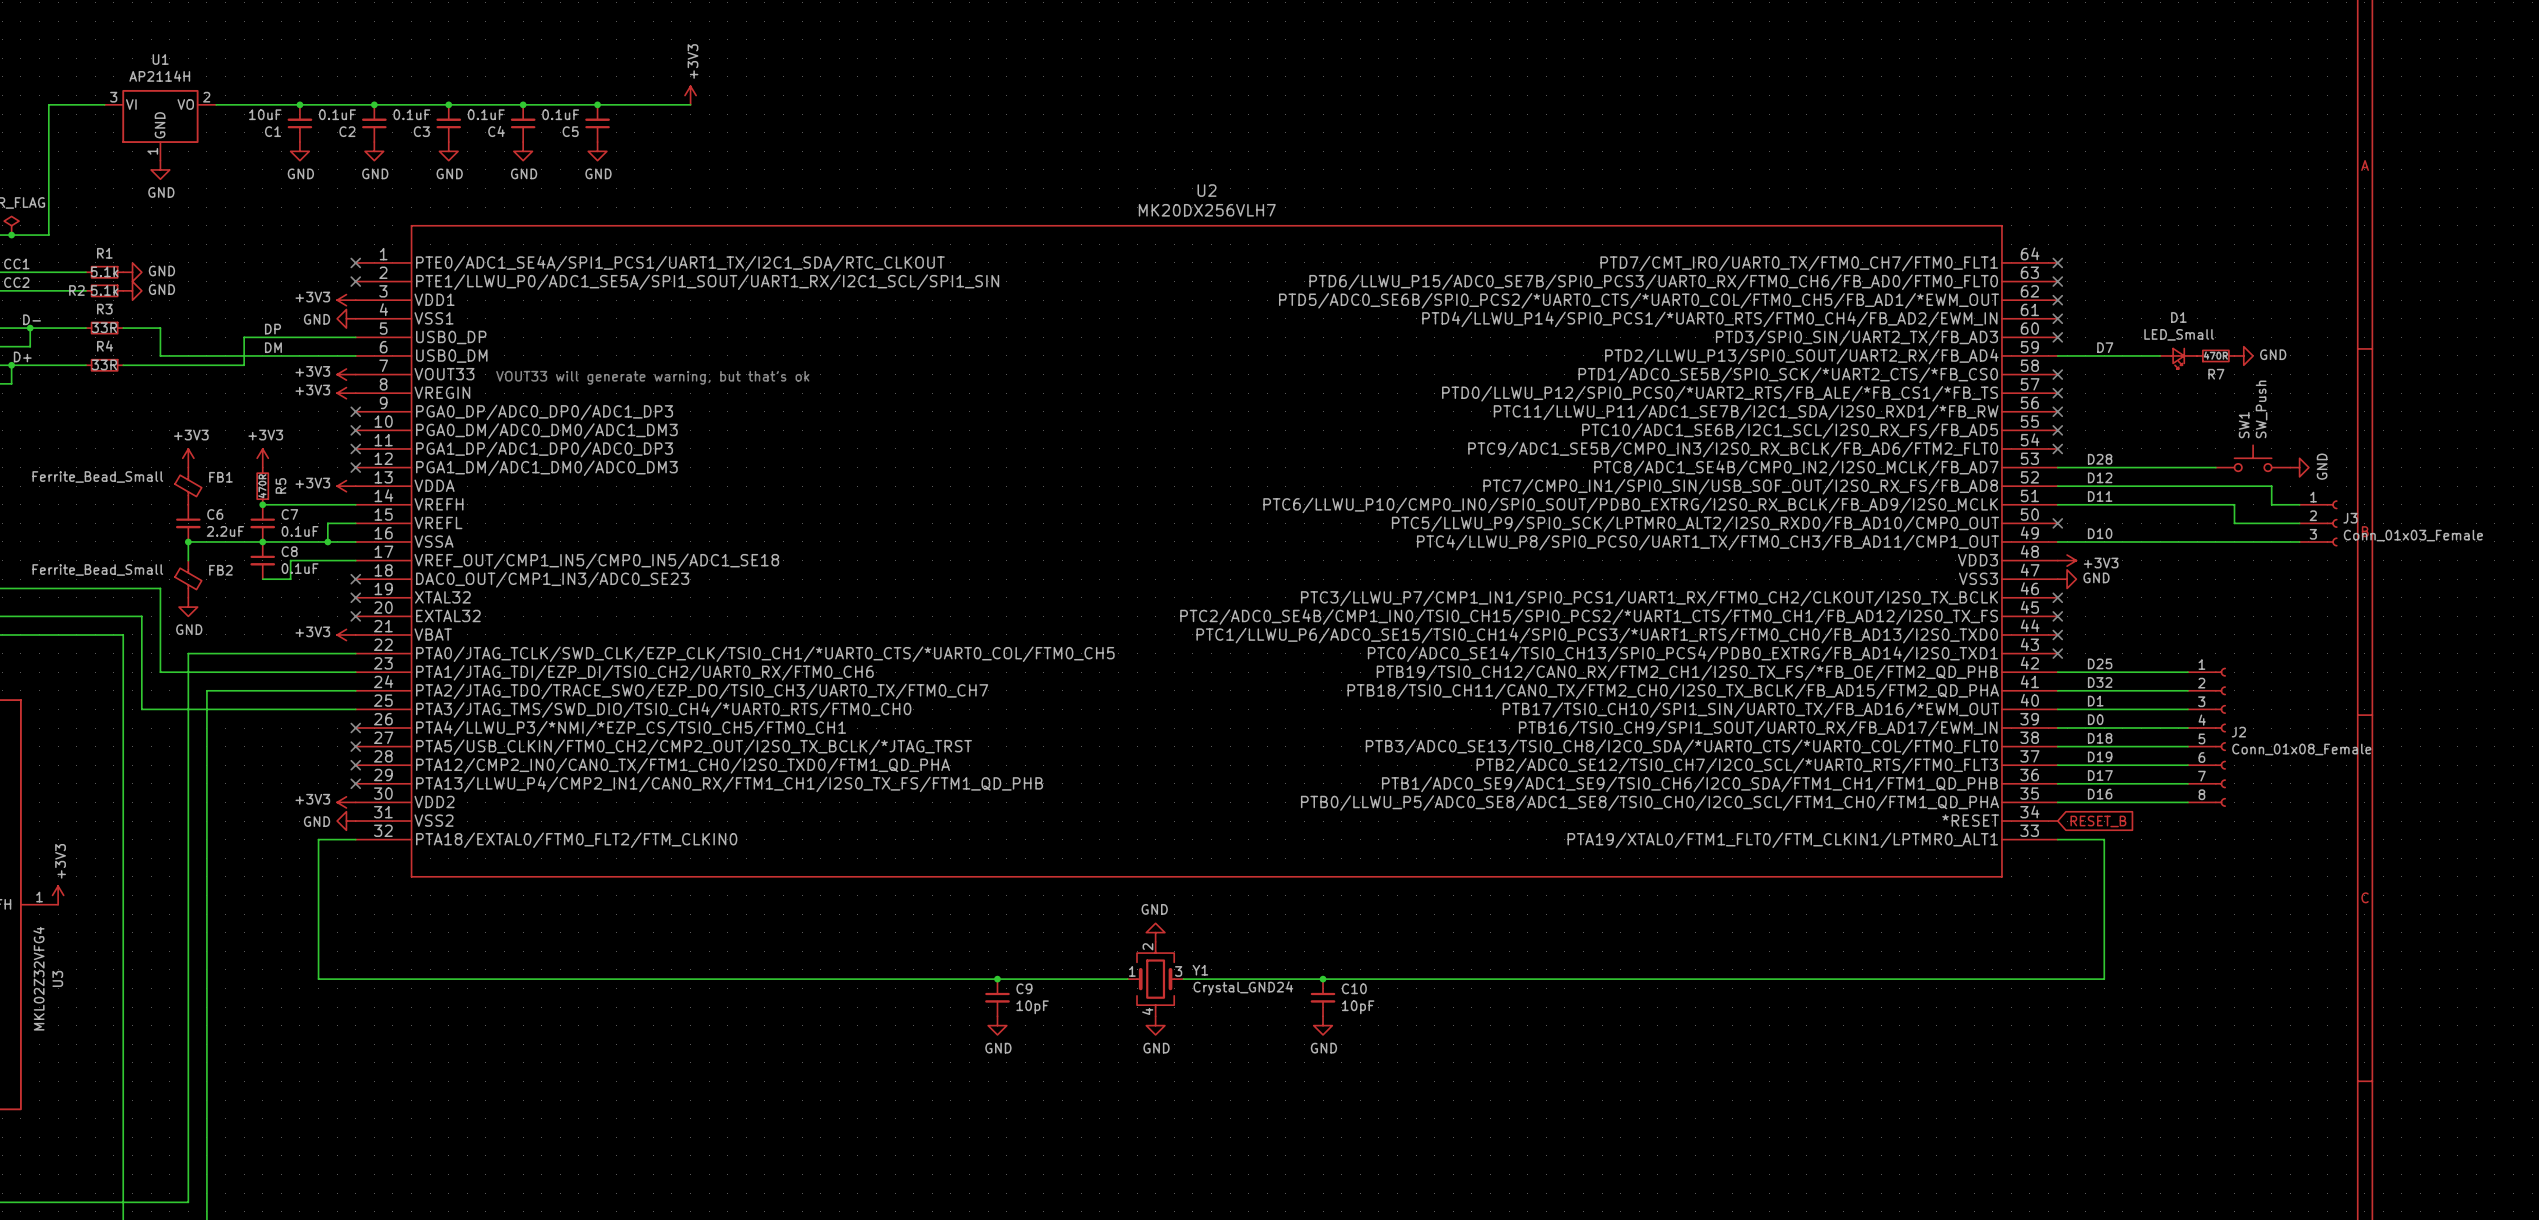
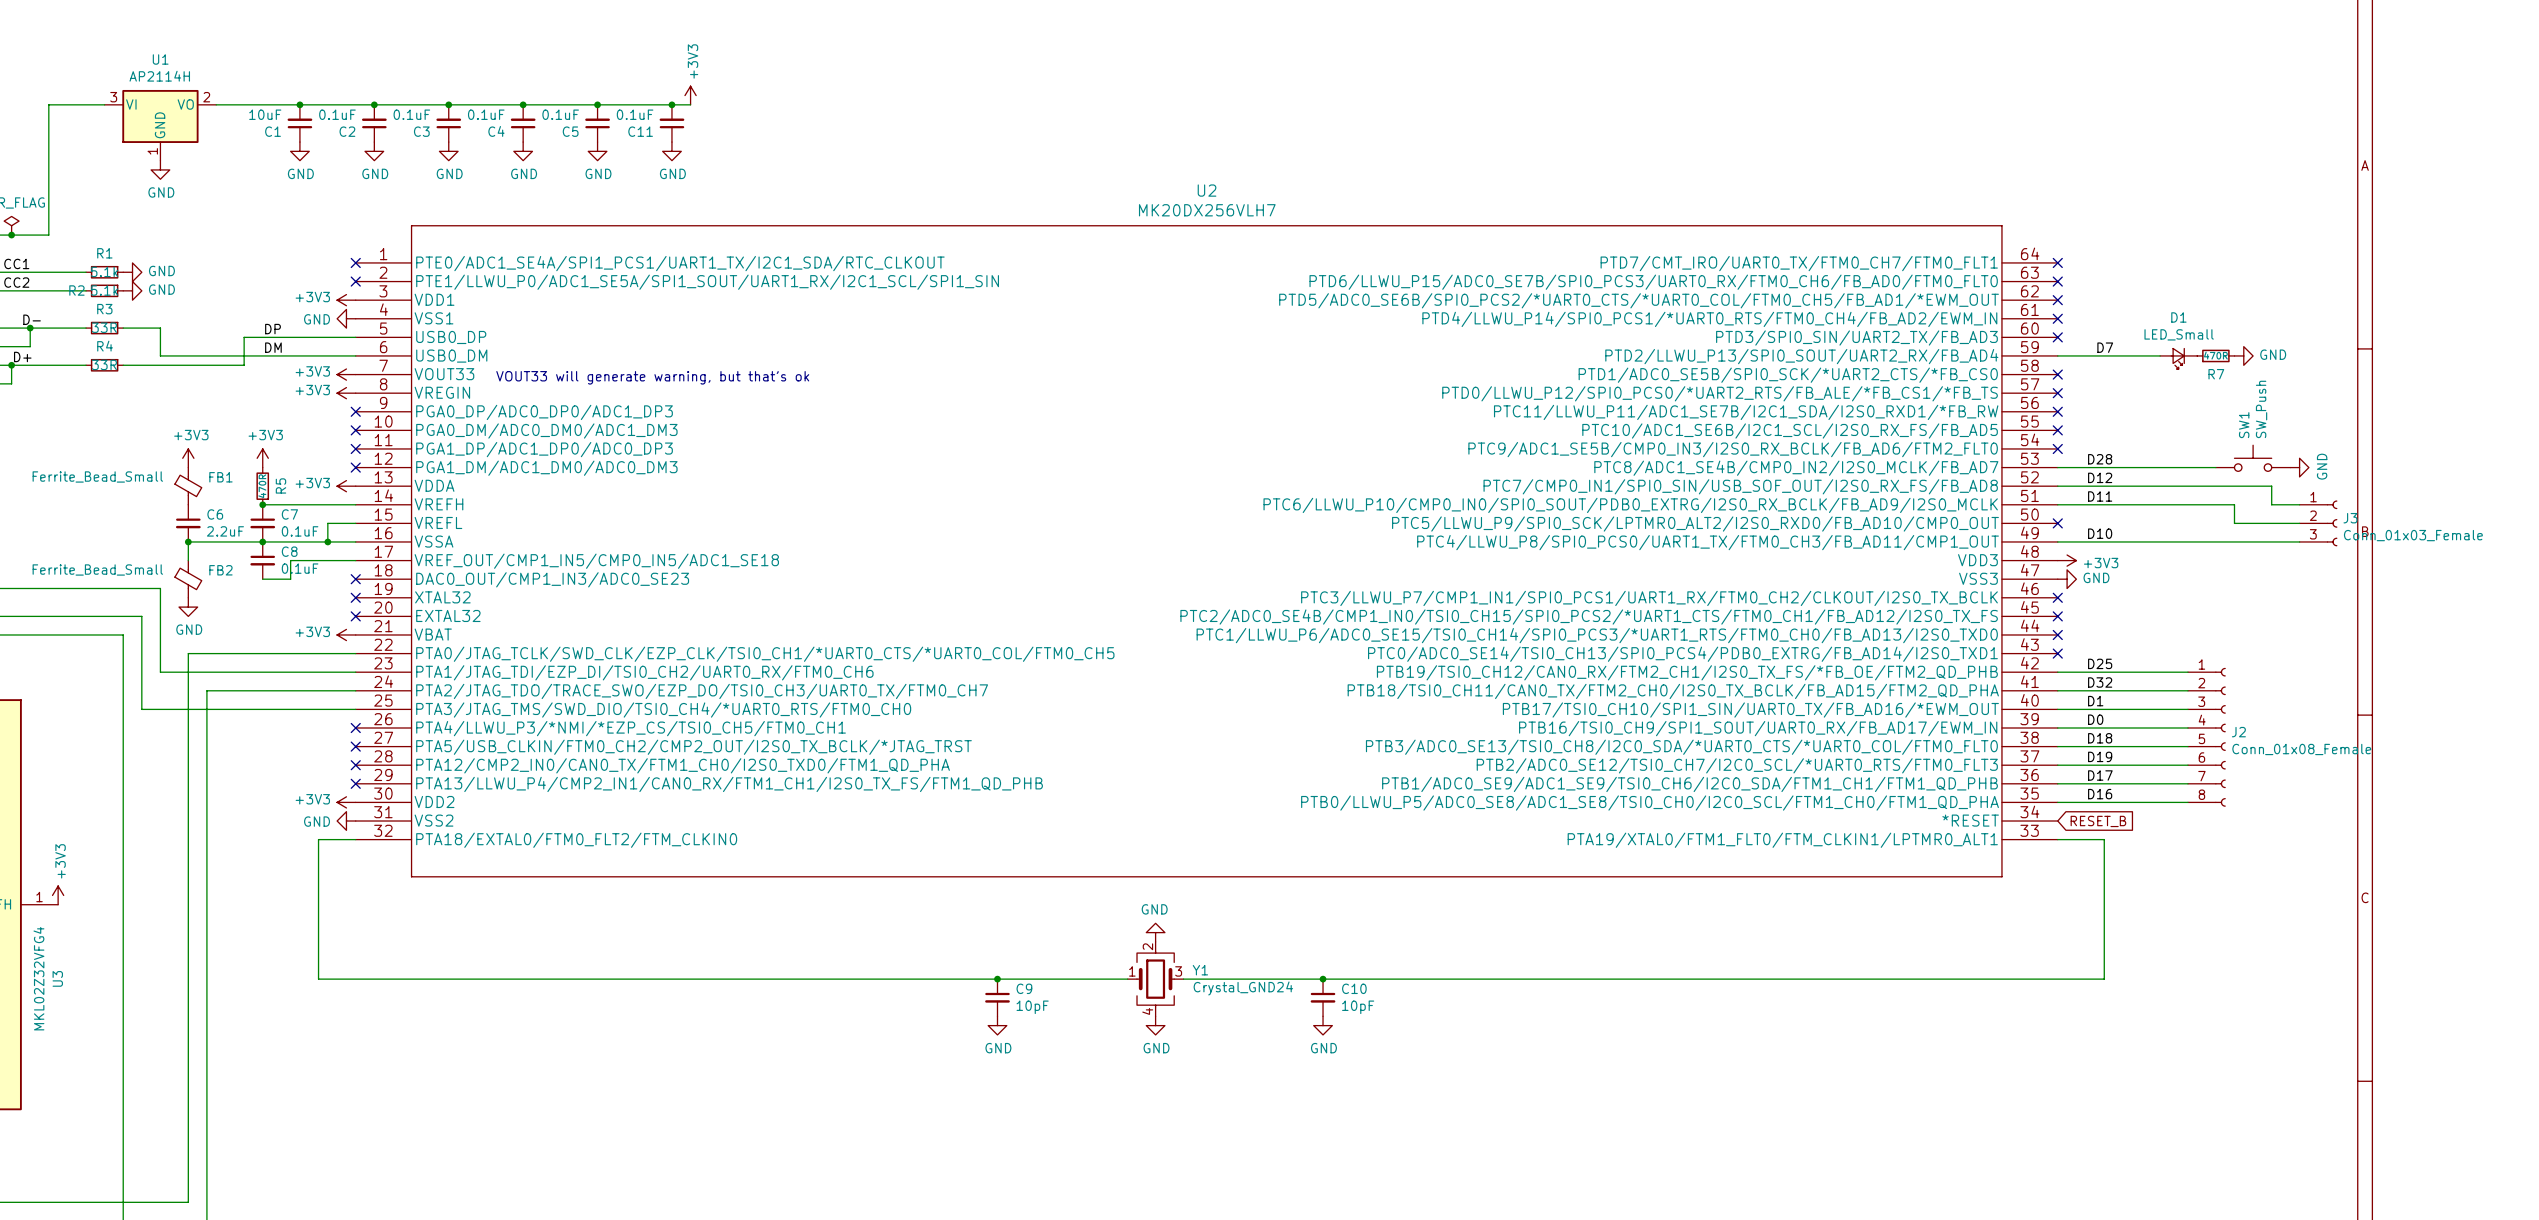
junction: none -> (671, 104)
C11: none -> 0.1uF (671, 123)
power symbol: none -> GND (671, 151)

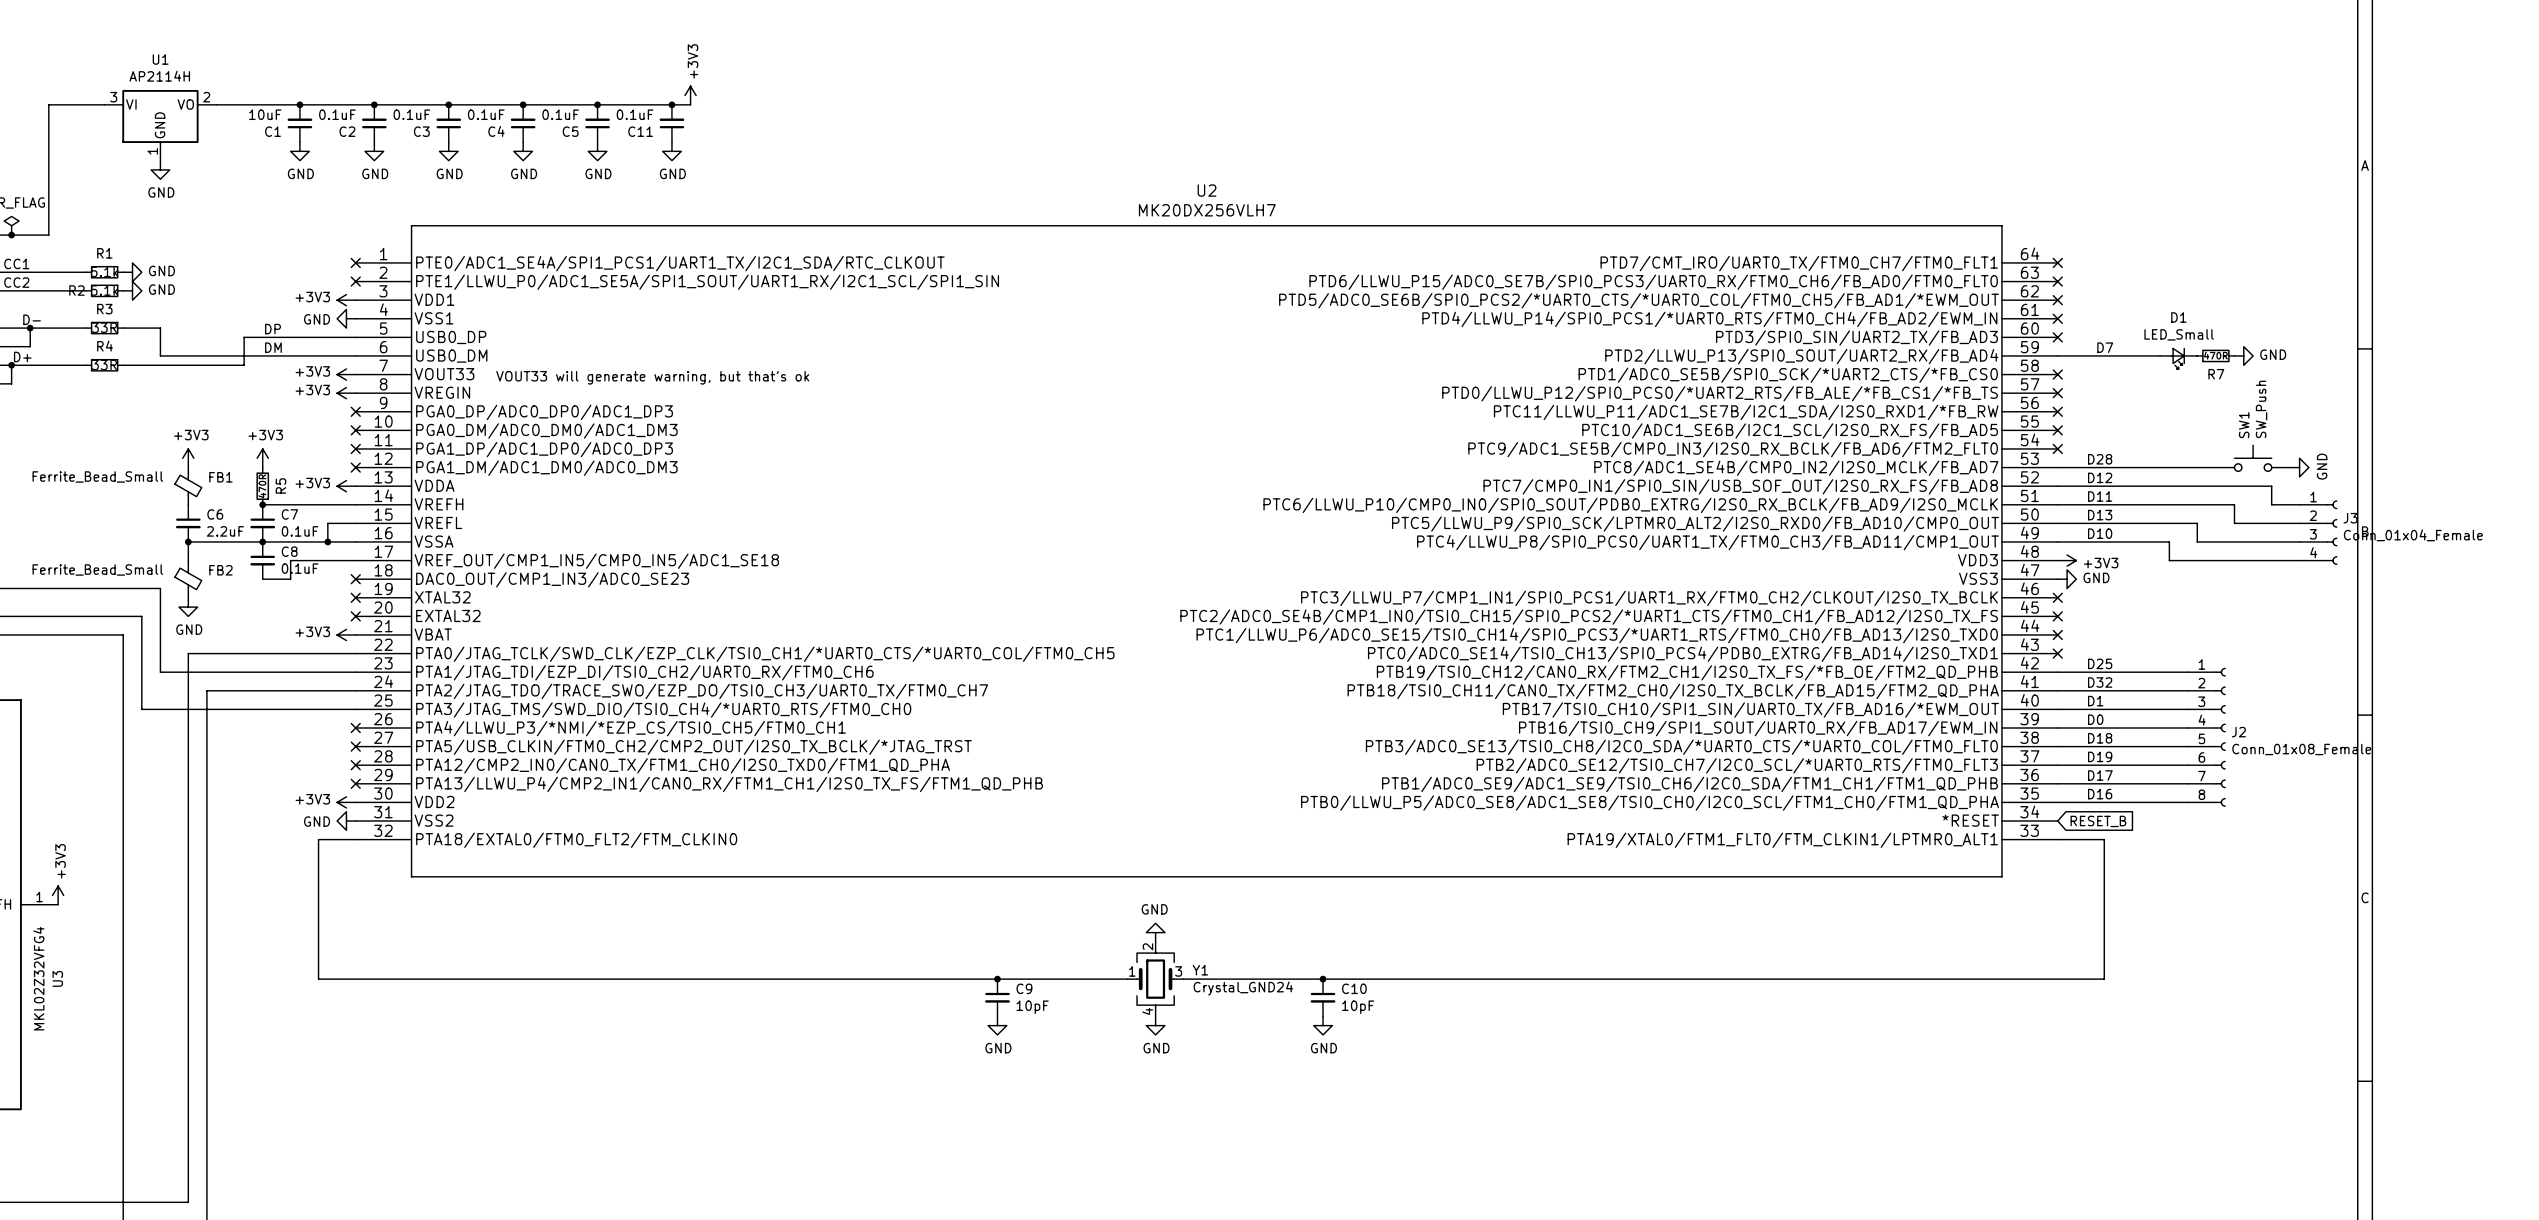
J3 symbol: [2299, 500, 2338, 547] -> [2299, 500, 2338, 565]
label: none -> D13 (2100, 515)
wire: none -> (2057, 523) (2197, 523) (2197, 541)
no-connect mark: (2057, 523) -> none
J3 value: Conn_01x03_Female (2413, 535) -> Conn_01x04_Female (2413, 535)
wire: (2169, 541) (2197, 541) -> (2169, 541) (2169, 560) (2299, 560)

